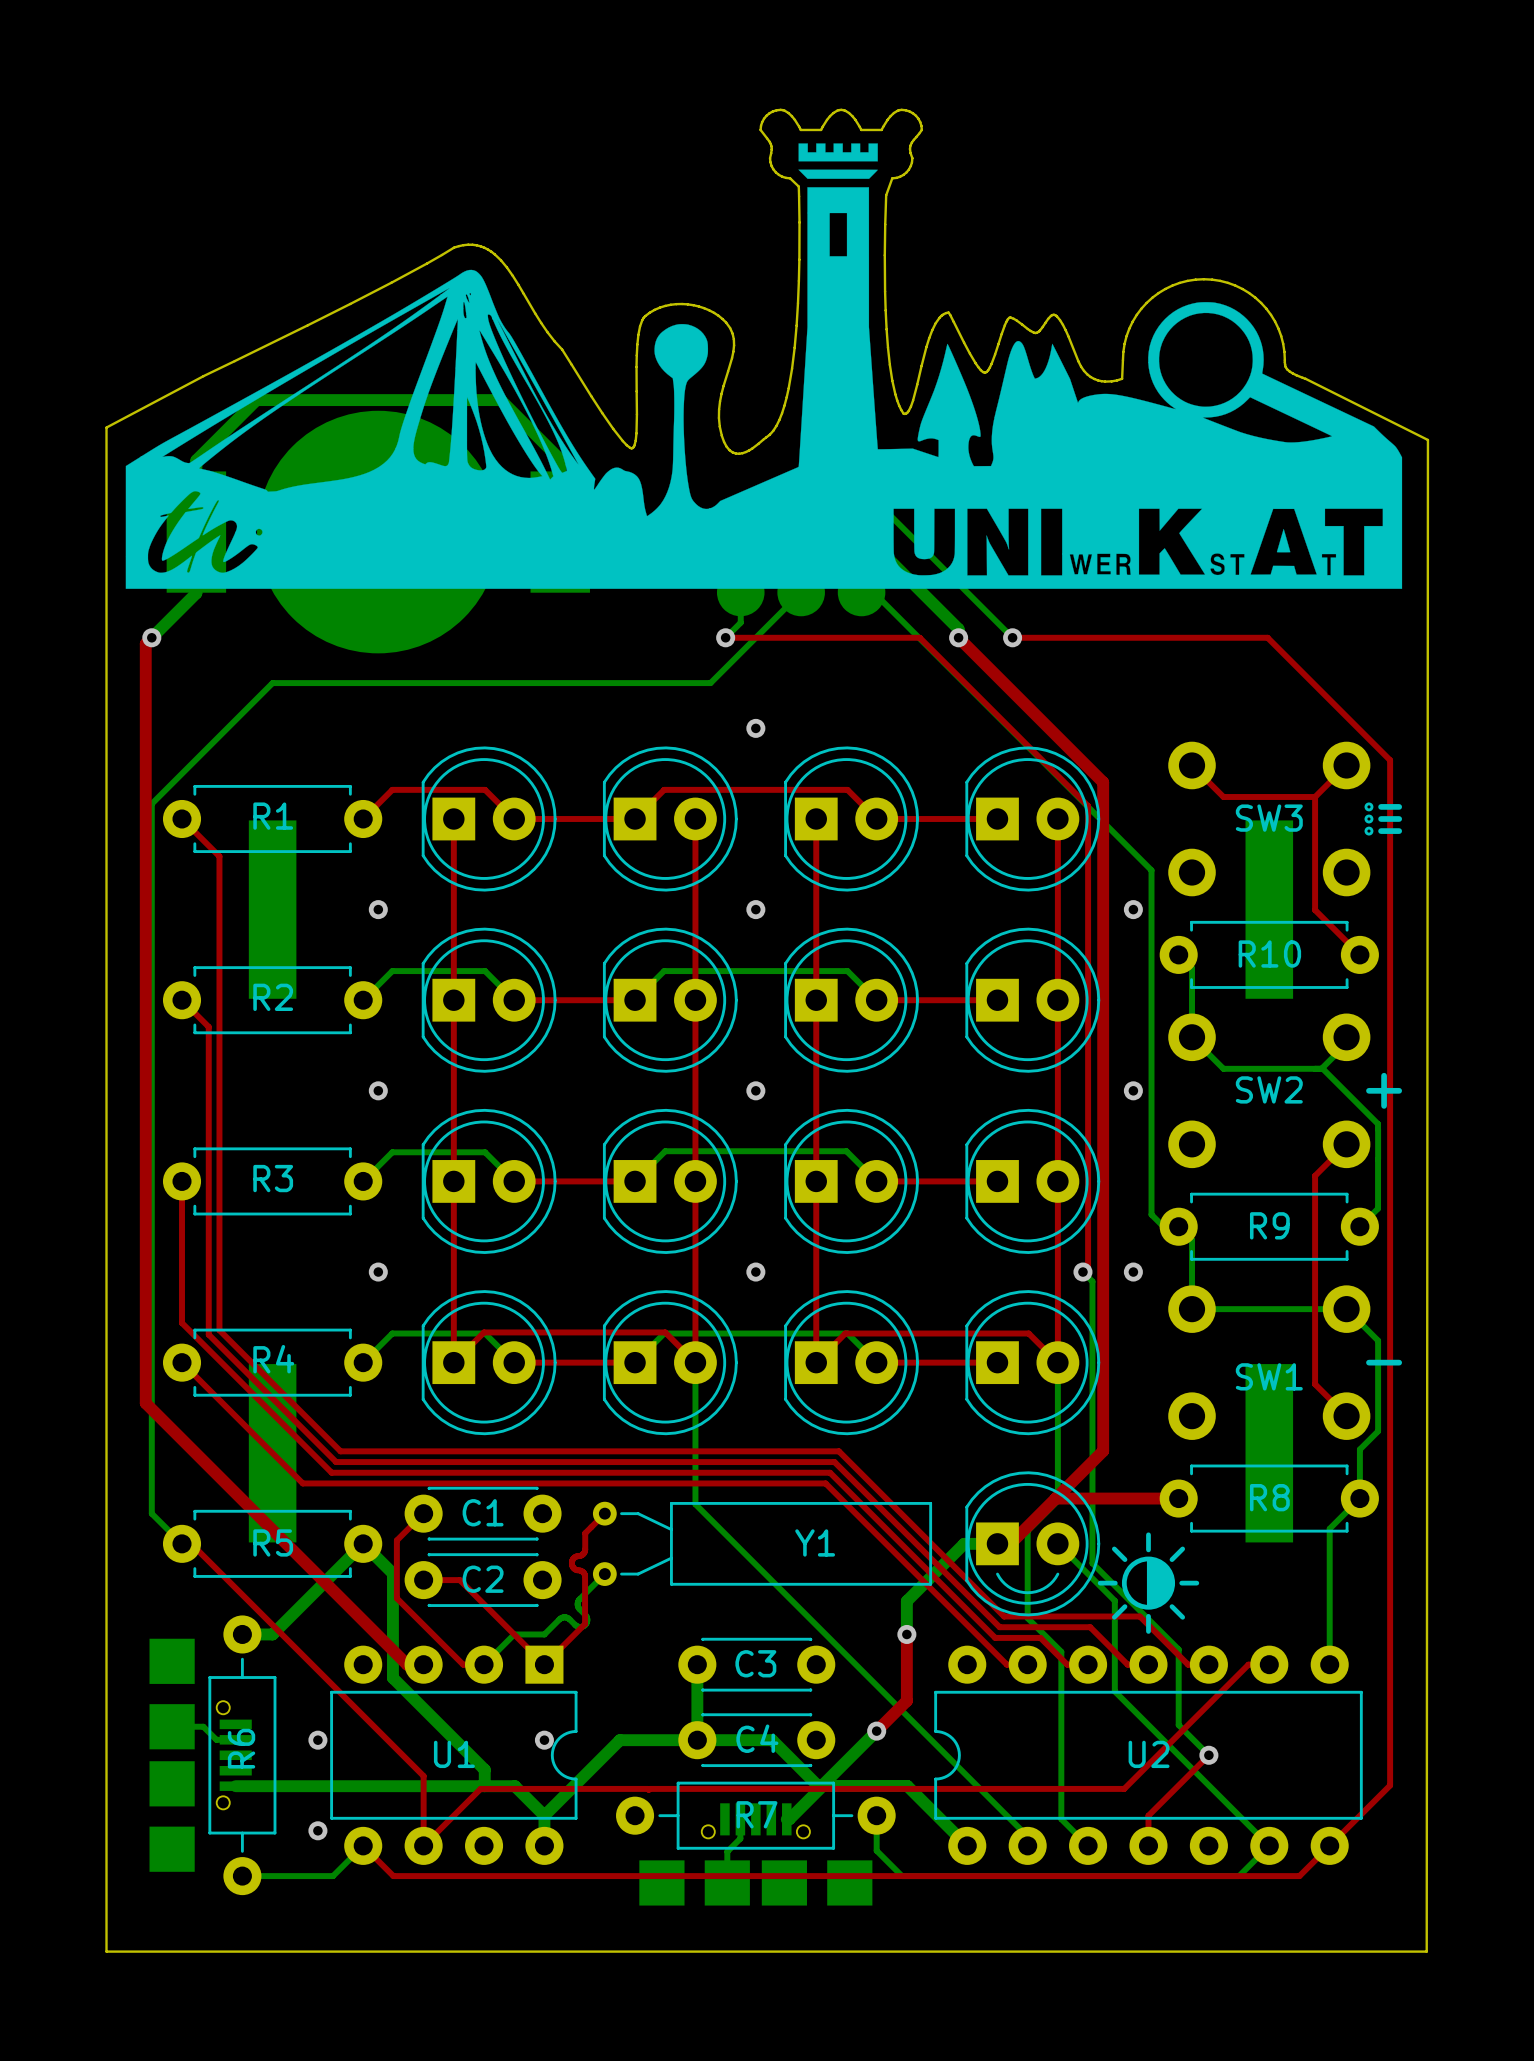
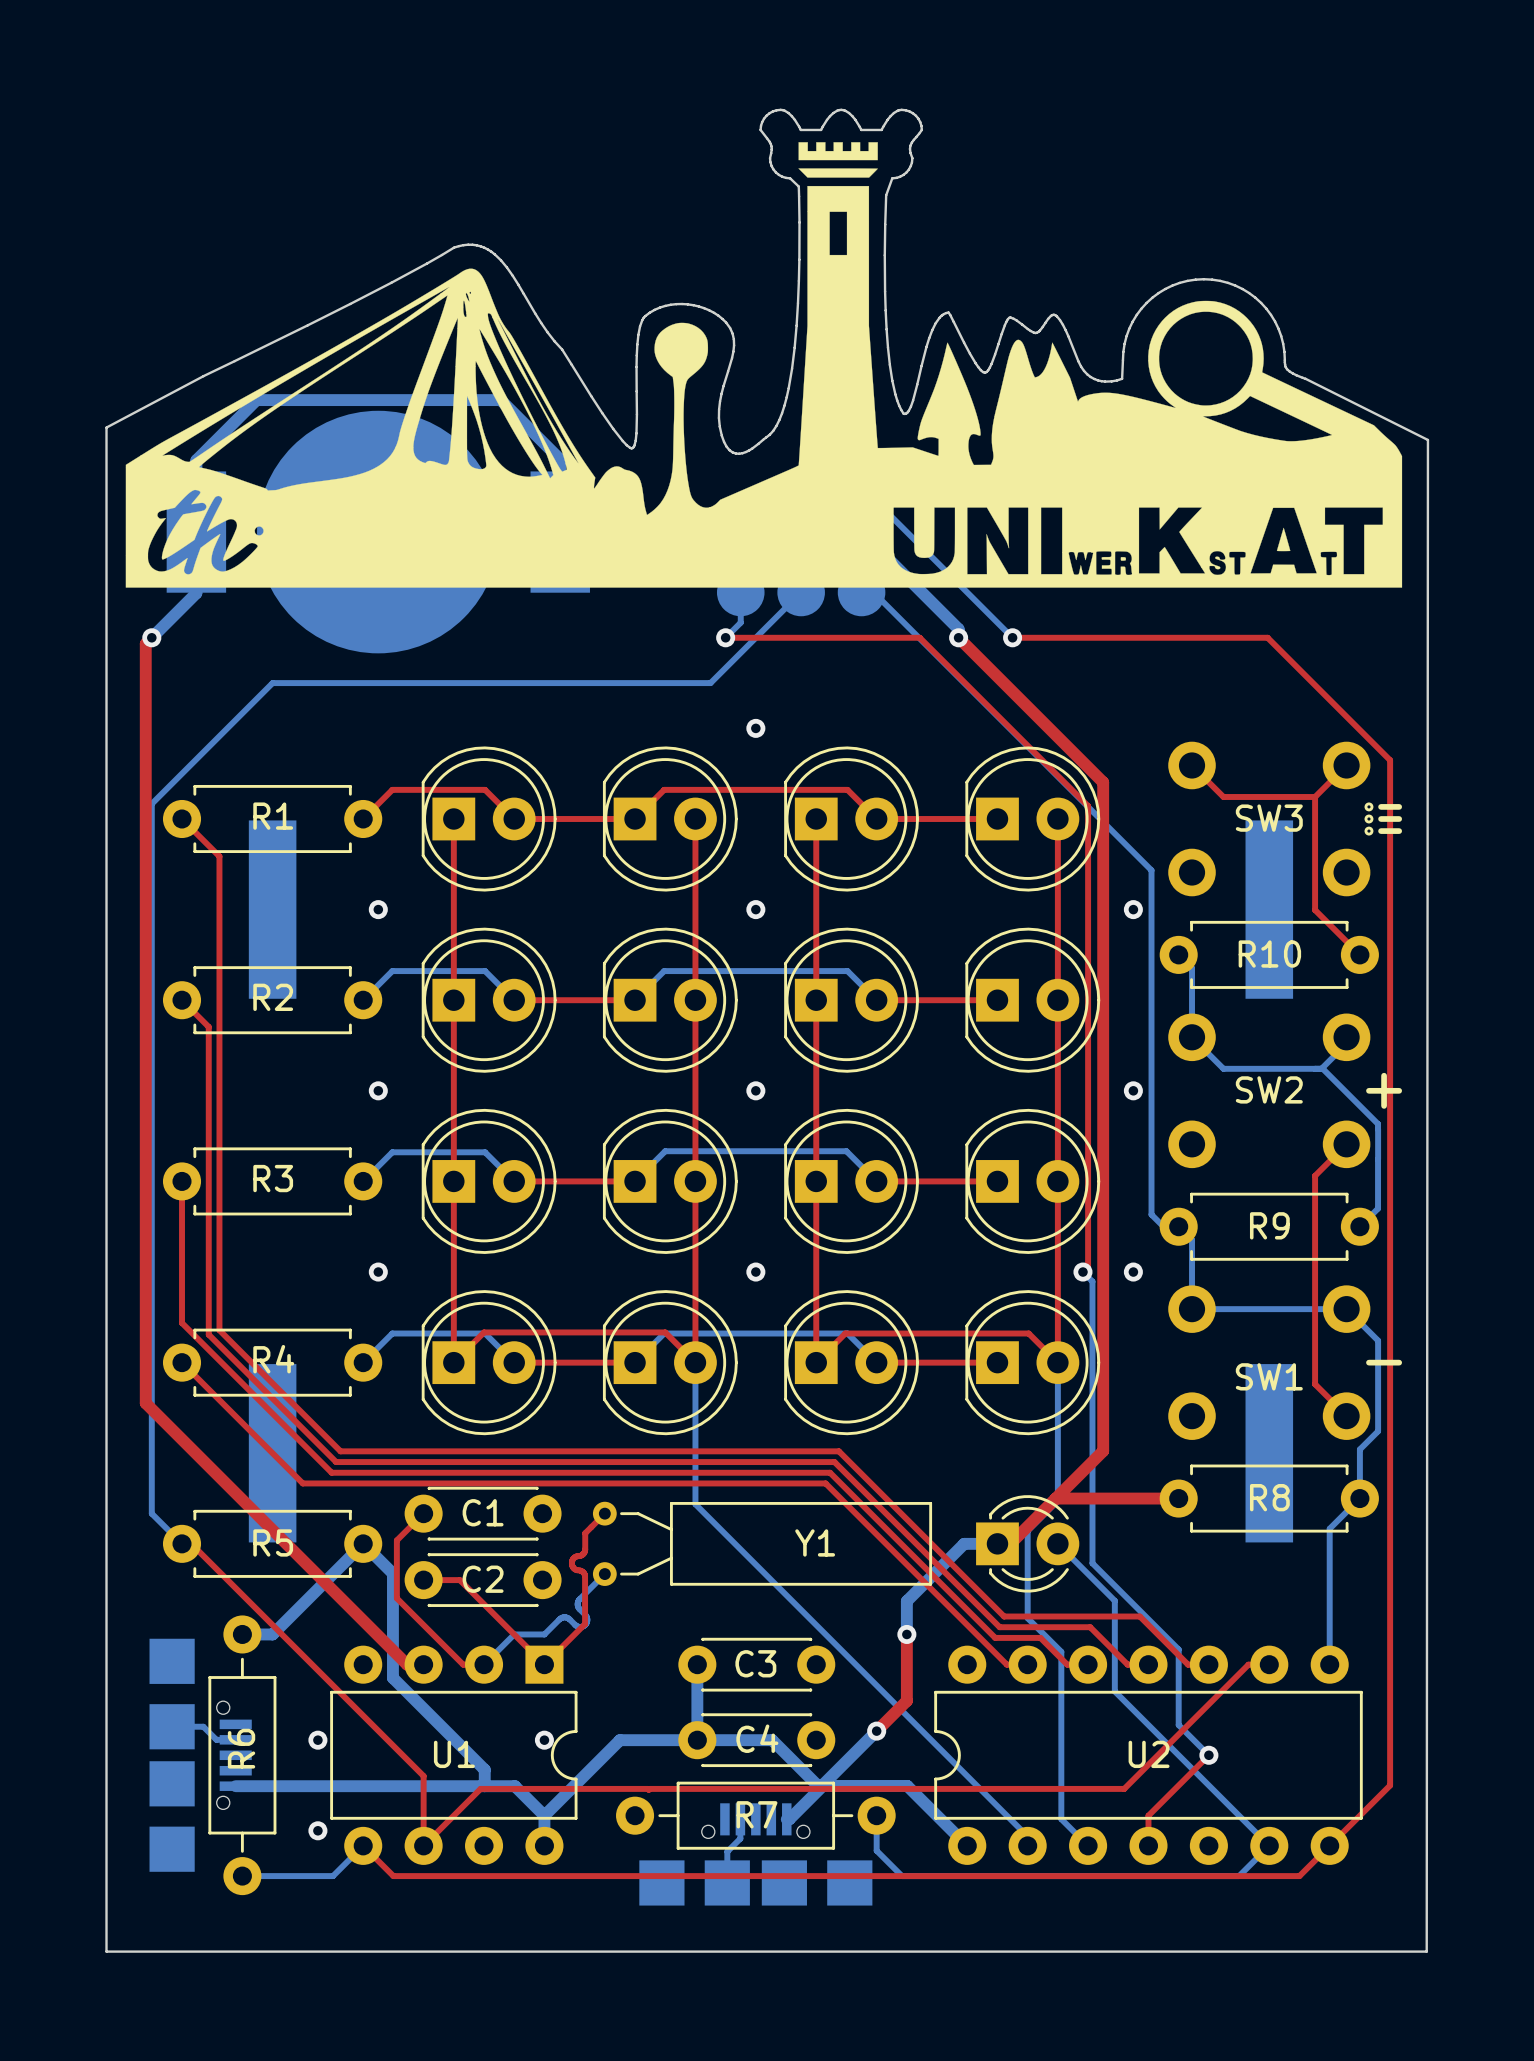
drawing shape: [125, 143, 1403, 589] -> [125, 142, 1403, 588]
part: none -> (1027, 1543)
part: (1082, 1552) -> none

